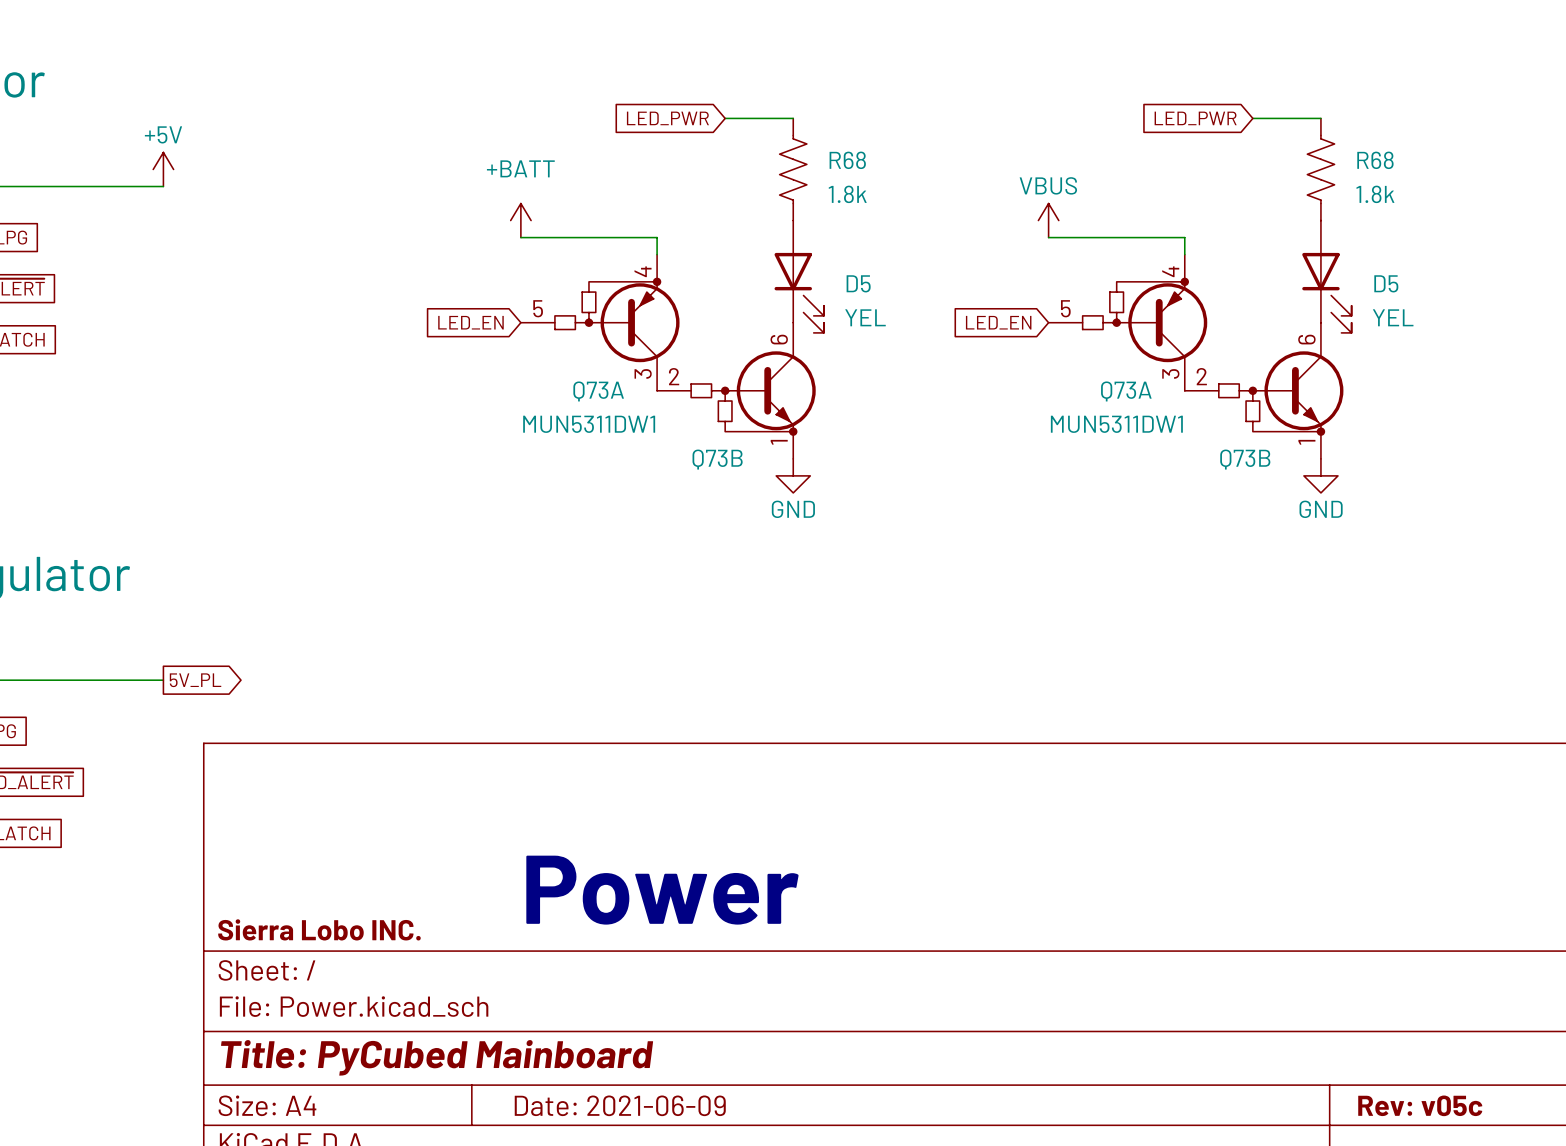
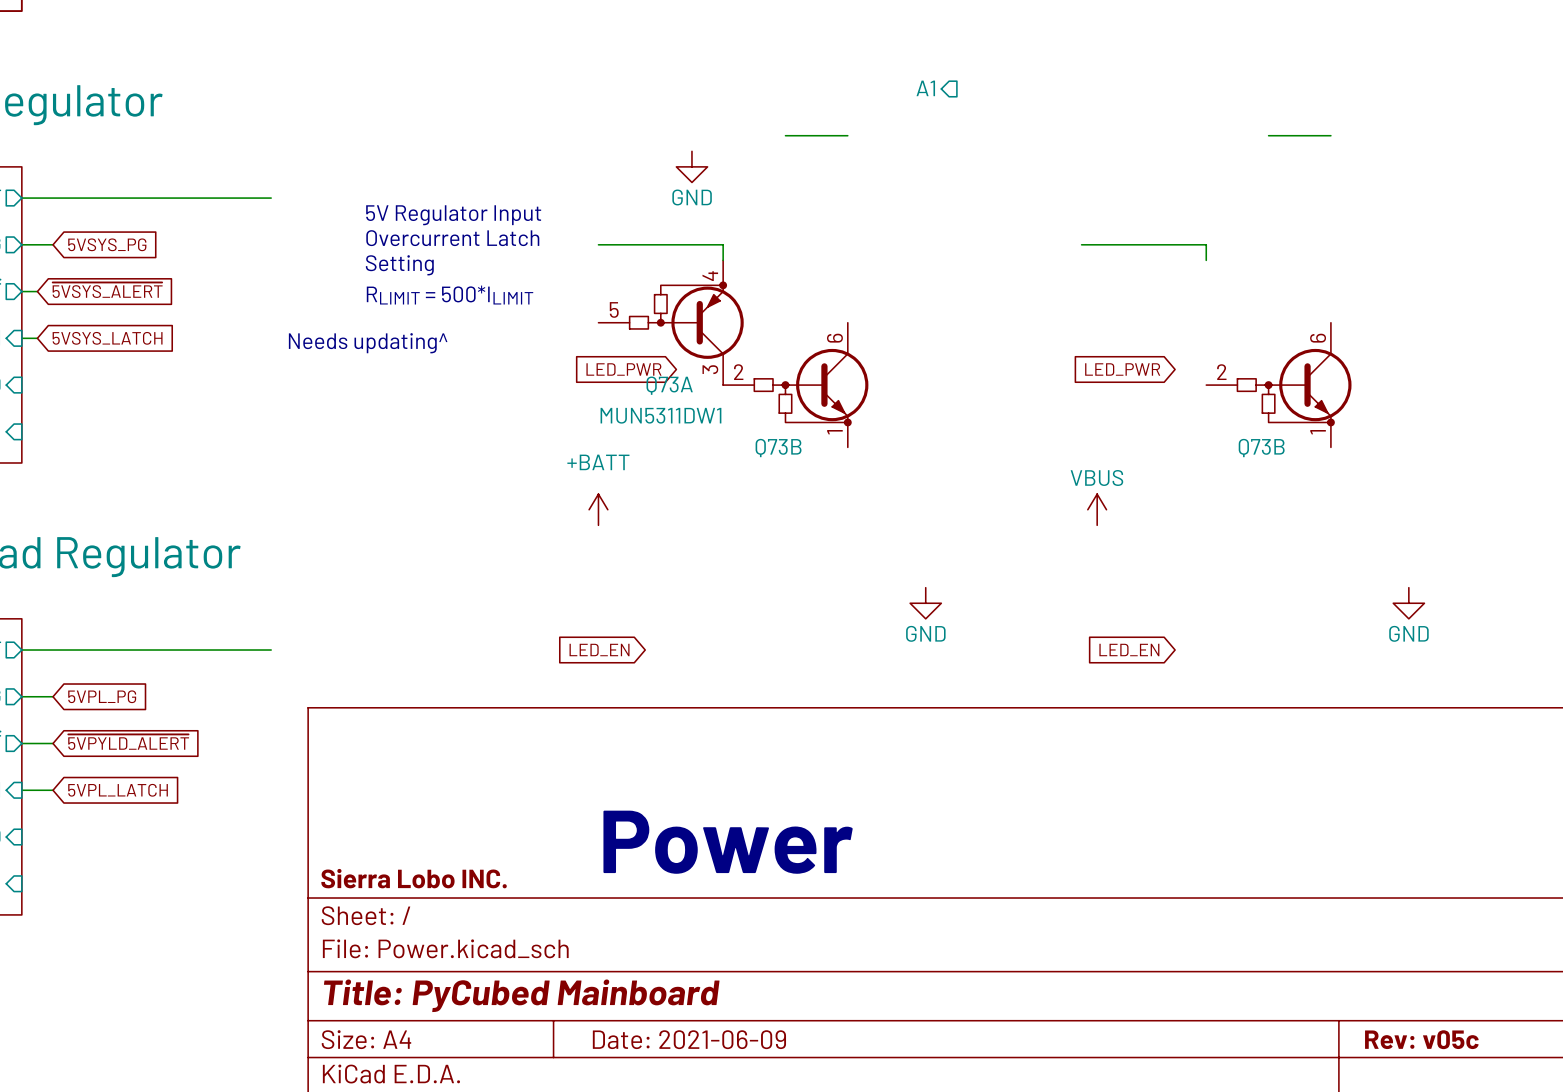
sheet pin: none -> A1 (925, 88)
global label: LED_PWR (667, 118) -> none
global label: LED_PWR (1195, 118) -> none
power symbol: none -> GND (691, 166)
power symbol: +5V (163, 169) -> none
R68: 1.8k (793, 169) -> none
R68: 1.8k (1320, 169) -> none
text: none -> 5V Regulator Input (453, 215)
power symbol position: +BATT (520, 220) -> +BATT (598, 509)
power symbol position: VBUS (1048, 220) -> VBUS (1097, 509)
text: none -> Overcurrent Latch (452, 238)
text: none -> Setting (399, 265)
D5: YEL (799, 276) -> none
D5: YEL (1326, 276) -> none
text: none -> RLIMIT = 500*ILIMIT (450, 295)
global label: LED_EN (470, 322) -> none
global label: LED_EN (998, 322) -> none
Q73A: MUN5311DW1 (1127, 322) -> none
text: none -> Needs updating^ (368, 343)
global label: none -> LED_PWR (623, 369)
global label: none -> LED_PWR (1122, 369)
power symbol position: GND (793, 475) -> GND (925, 603)
power symbol position: GND (1320, 475) -> GND (1408, 603)
global label: 5V_PL (195, 680) -> none
global label: none -> LED_EN (599, 650)
global label: none -> LED_EN (1129, 650)

